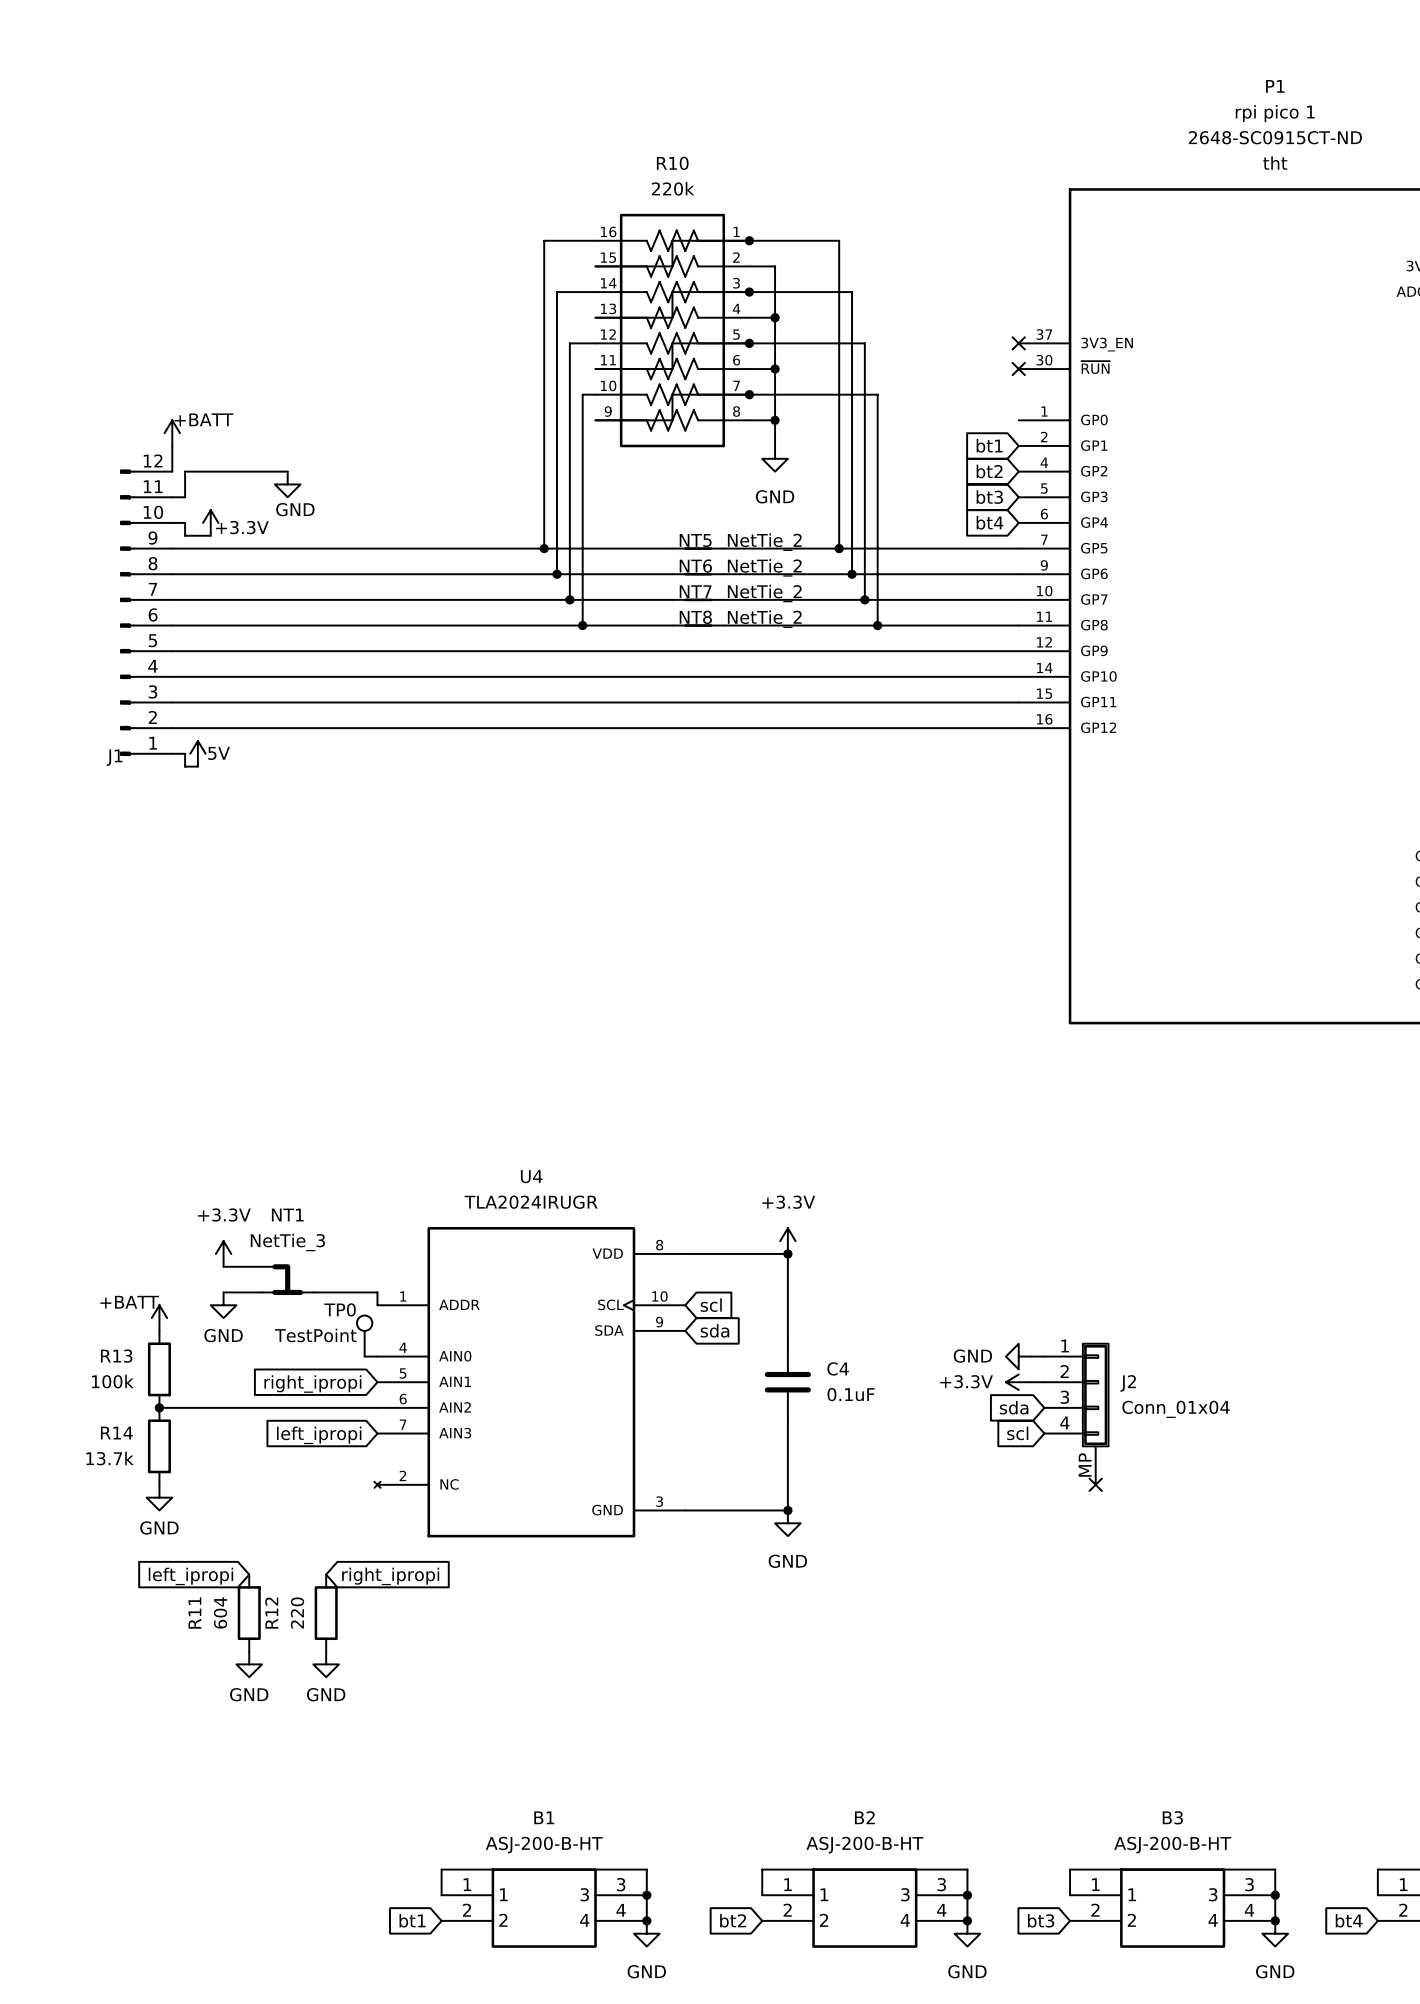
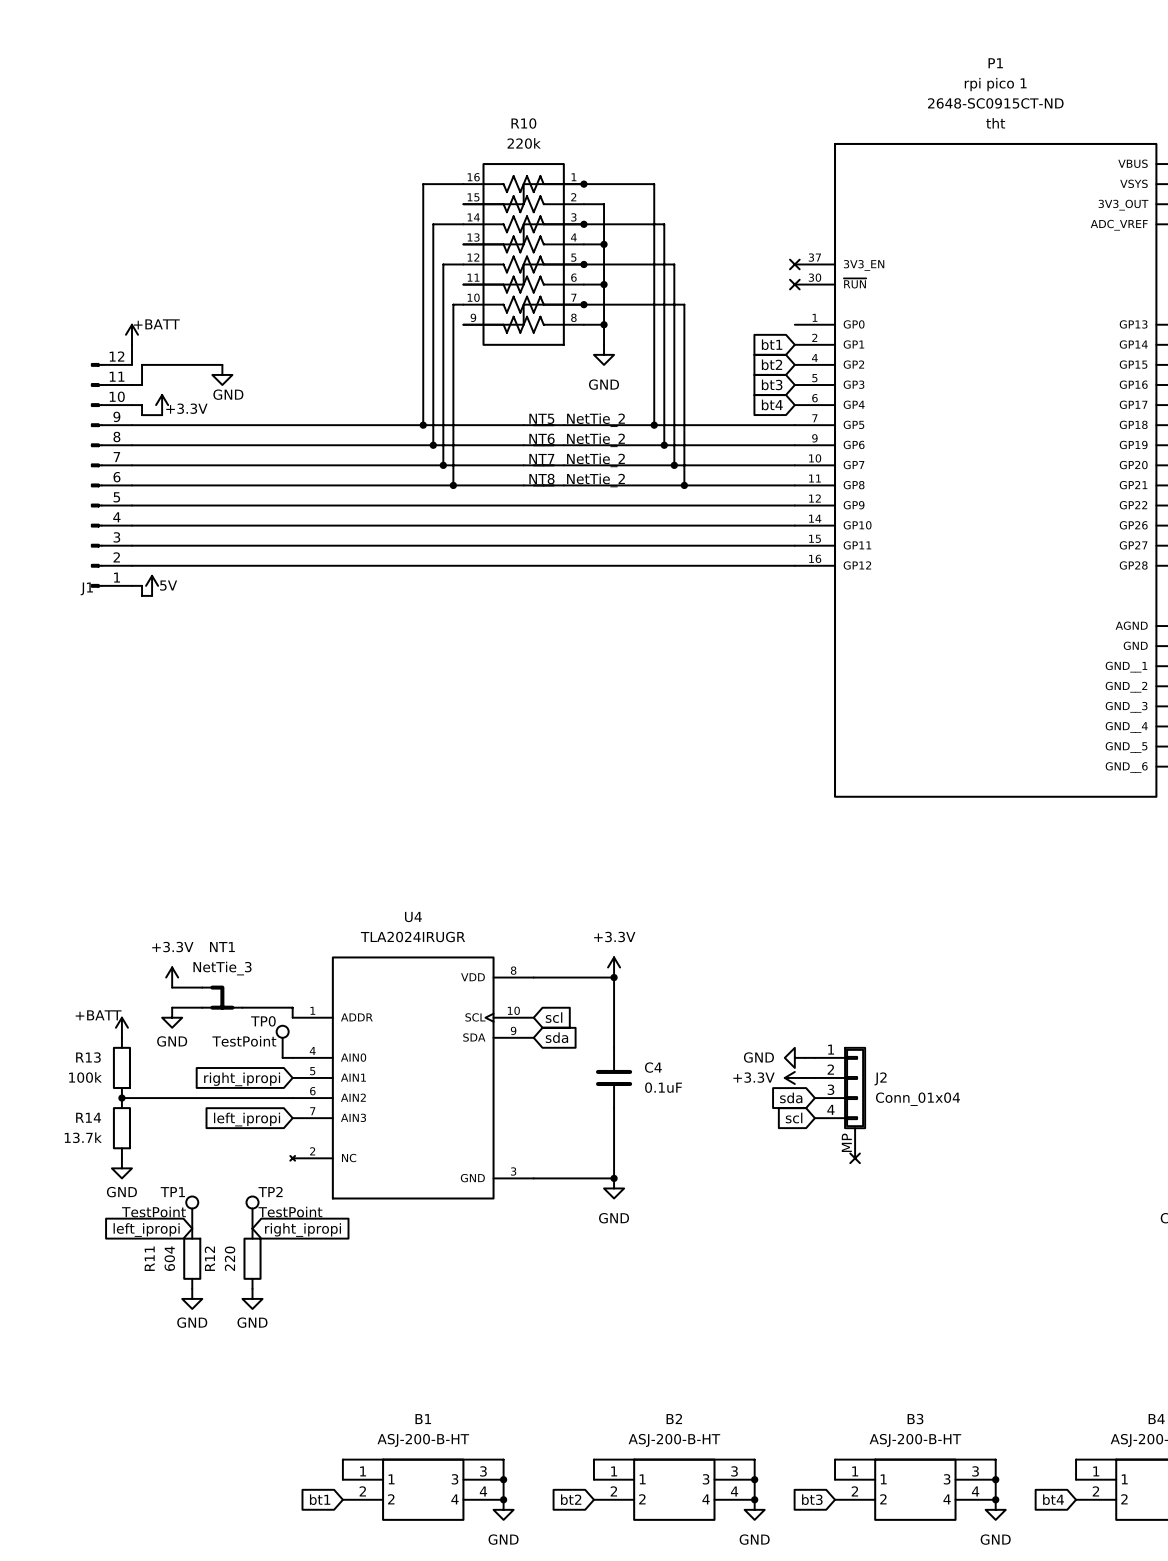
TP1: none -> TestPoint (192, 1212)
TP2: none -> TestPoint (252, 1212)

